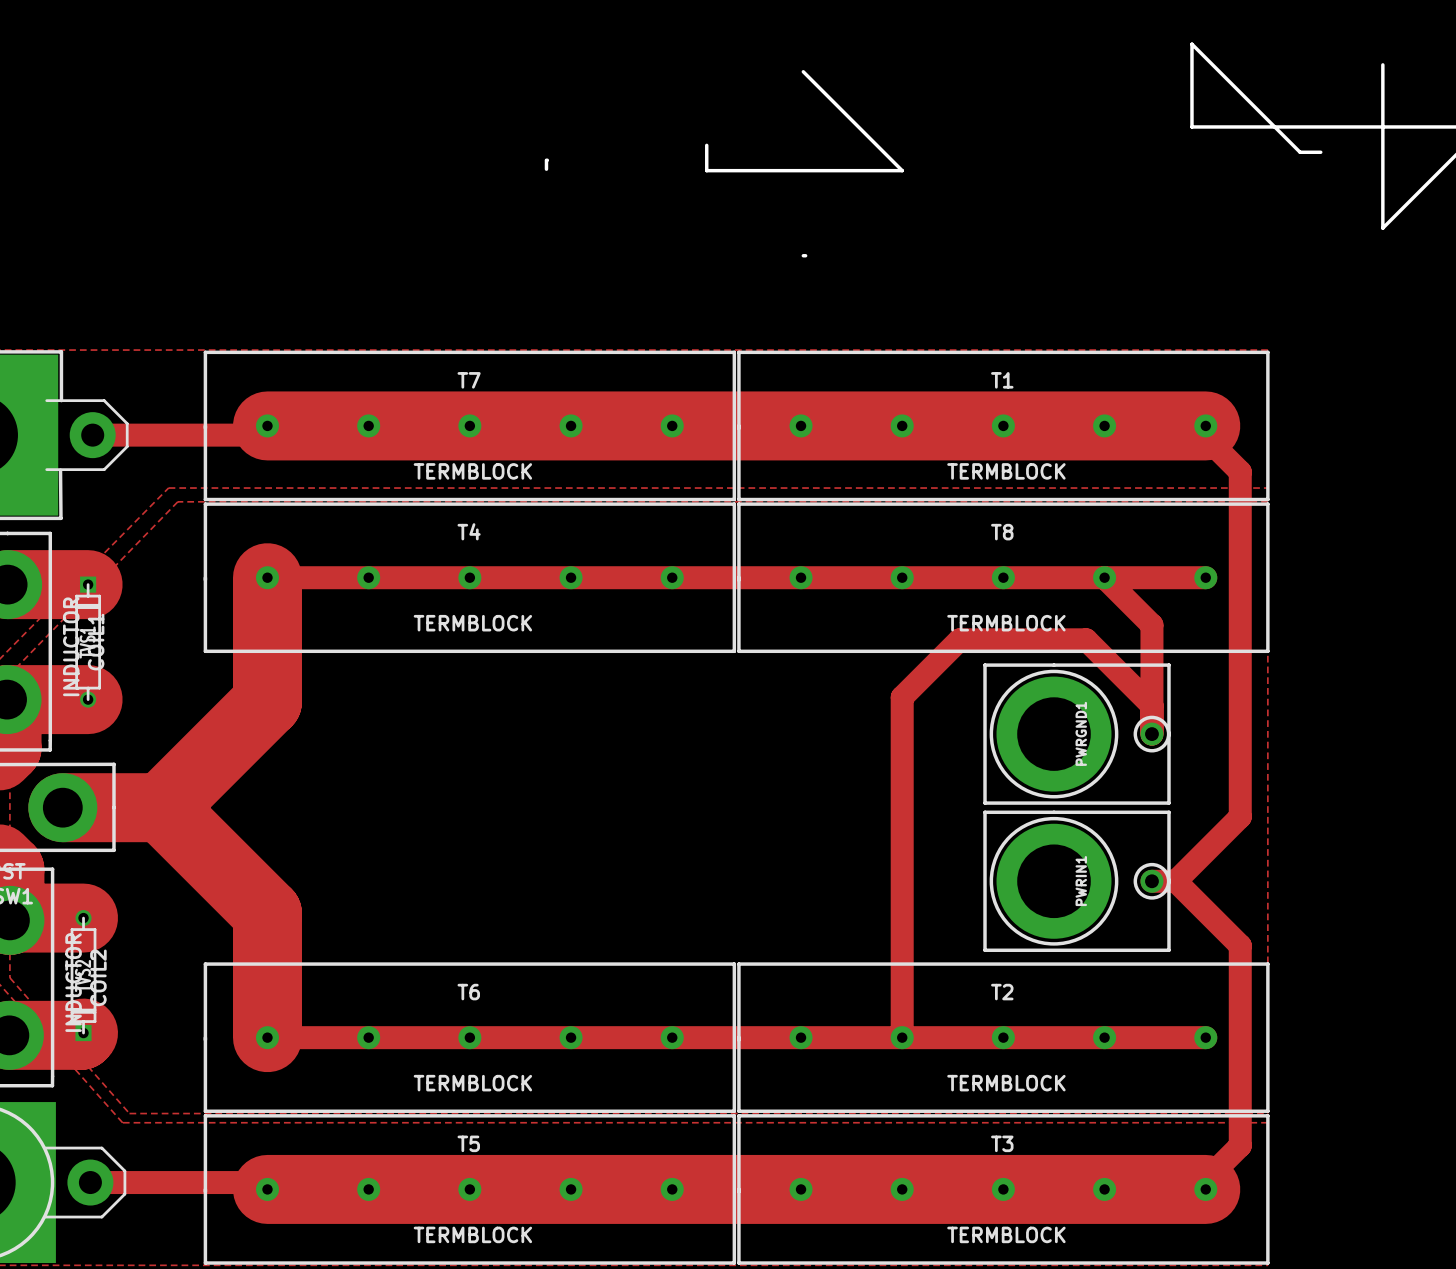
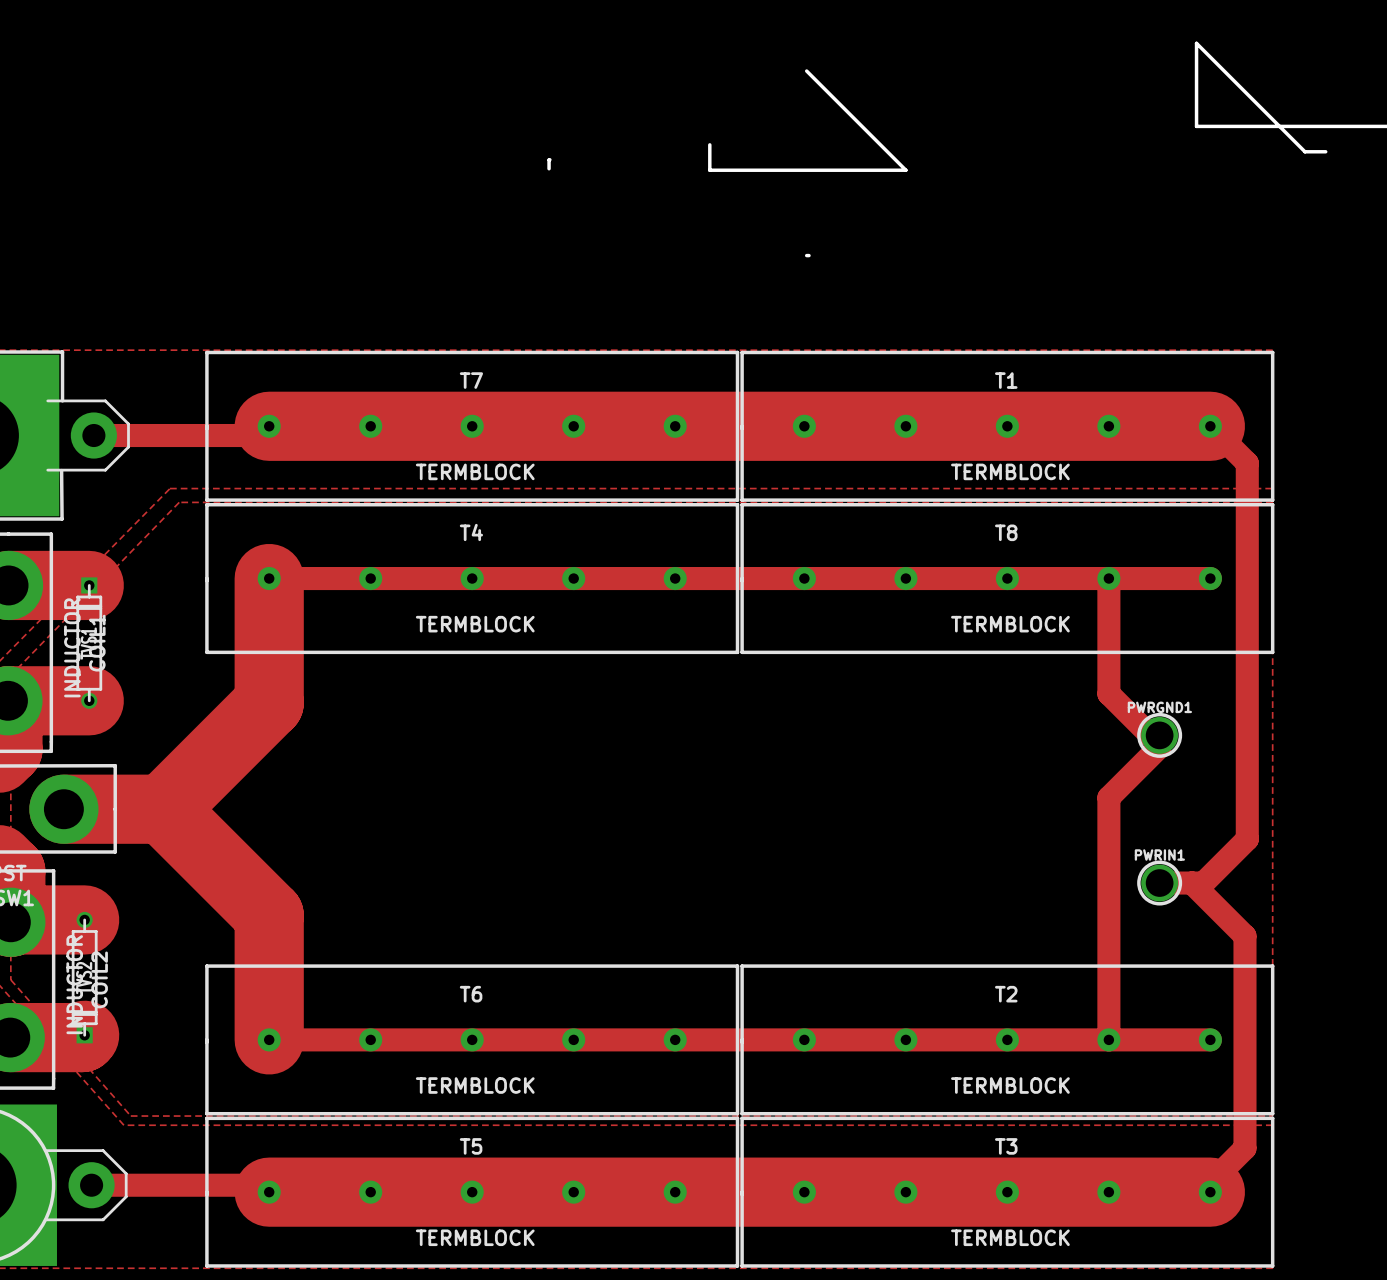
track: (1205, 425) (1205, 437) (1240, 471) (1240, 816) (1175, 881) (1240, 945) -> (1210, 426) (1247, 463) (1247, 839) (1203, 883) (1180, 883)
track: (1104, 577) (1151, 625) (1151, 734) -> (1108, 578) (1108, 693) (1150, 735) (1159, 735) (1159, 746) (1108, 797) (1108, 1039)
PWRGND1 footprint: [983, 663, 1171, 805] -> [1137, 712, 1183, 758]
track: (1151, 705) (1086, 639) (959, 639) (902, 697) (902, 1037) -> none
PWRGND1 name position: PWRGND1 (1081, 733) -> PWRGND1 (1159, 707)
PWRIN1 footprint: [983, 810, 1171, 952] -> [1137, 860, 1183, 906]
PWRIN1 name position: PWRIN1 (1081, 881) -> PWRIN1 (1159, 855)
track: none -> (1191, 883) (1244, 936) (1244, 947)

